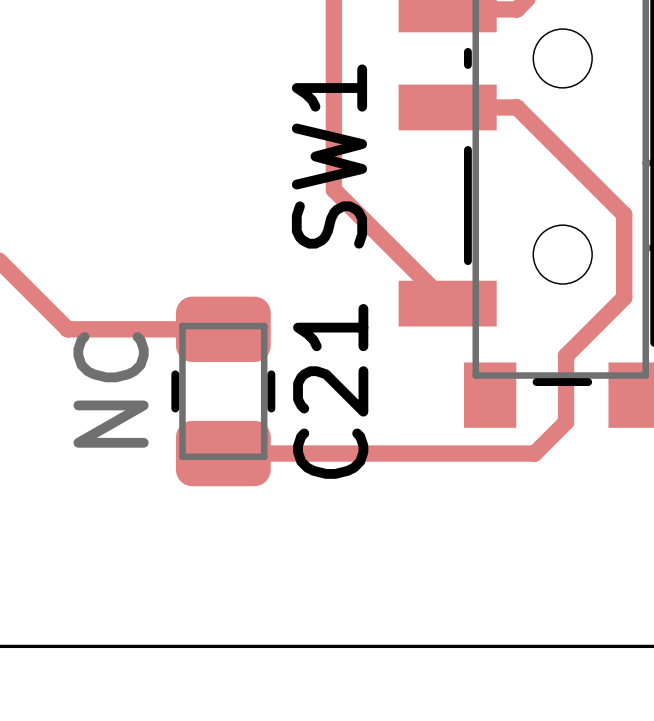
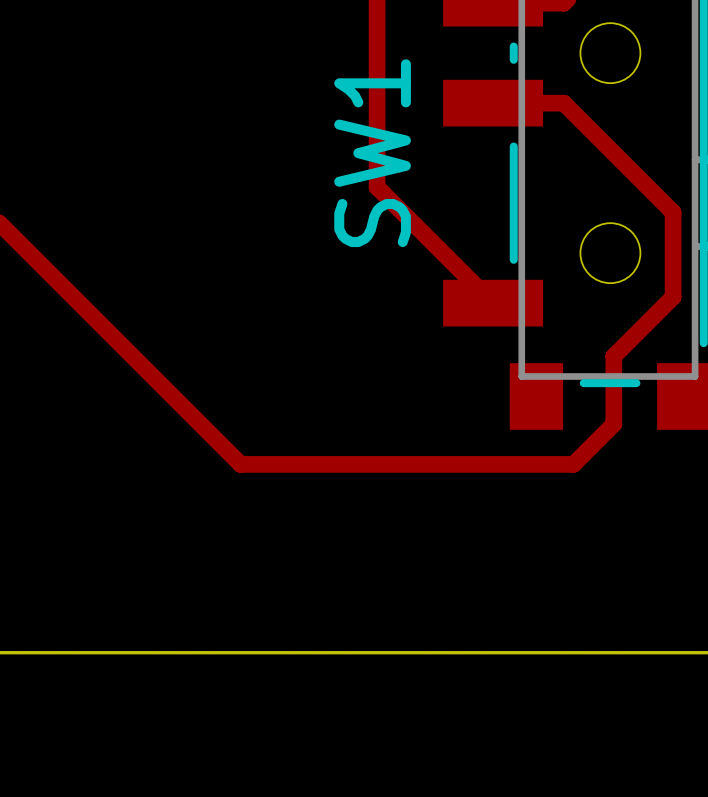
top track: (67, 329) (223, 329) -> none
C21: NC (223, 391) -> none
top track: (223, 453) (534, 453) -> (105, 329) (240, 464) (573, 464) (581, 456)

